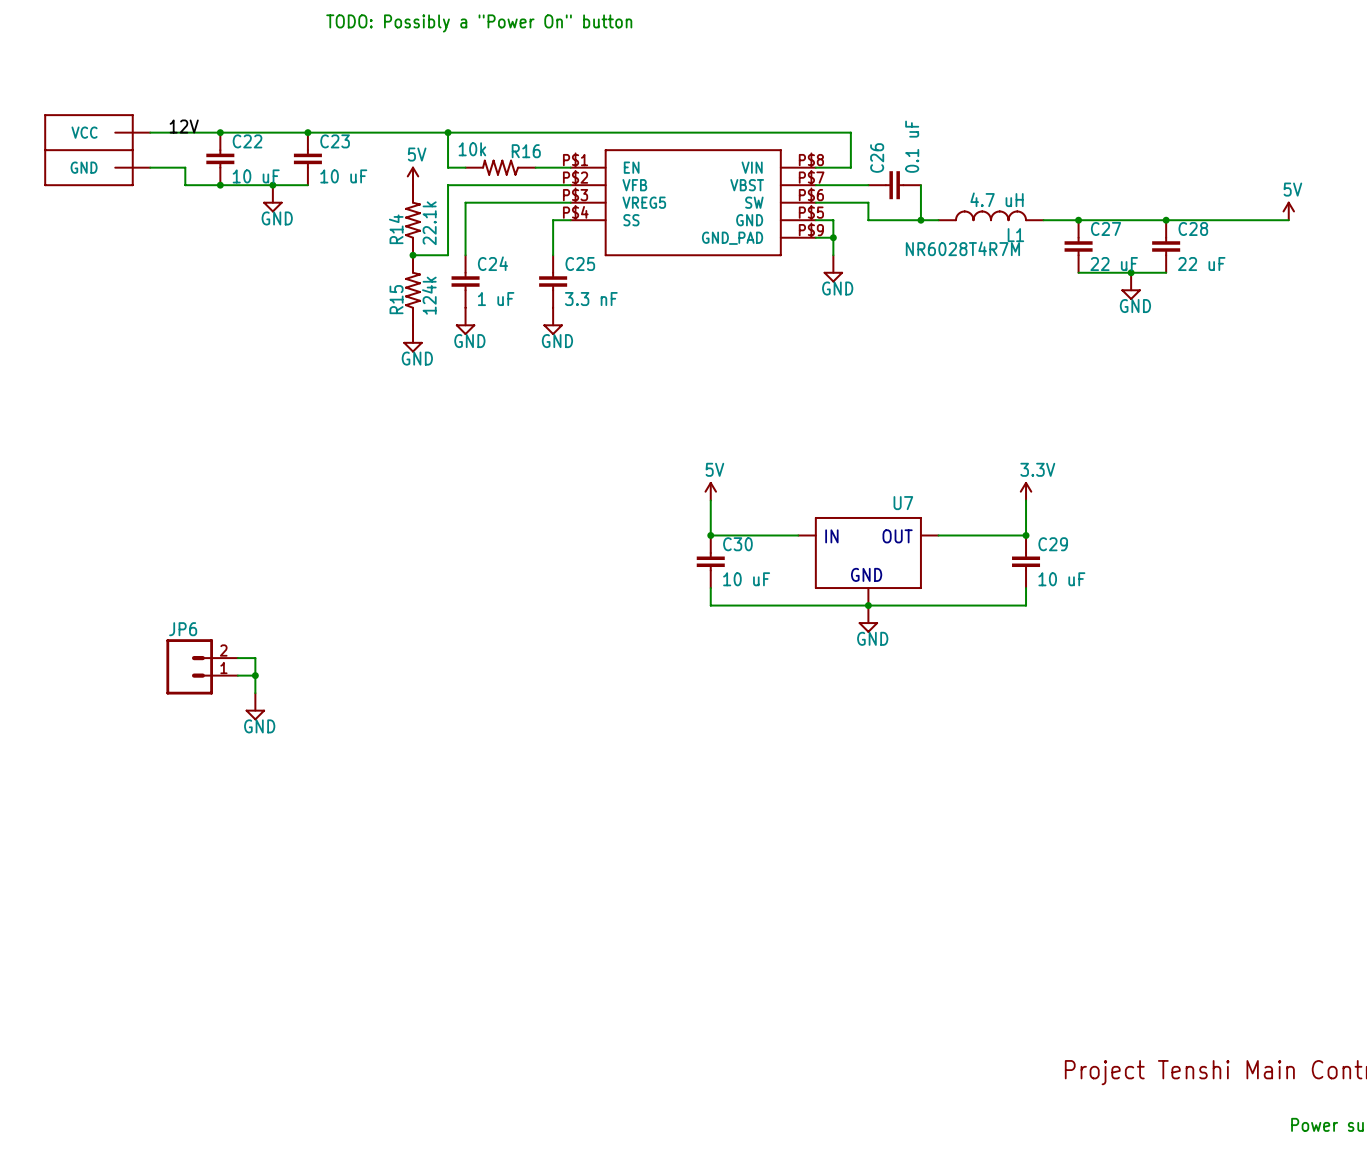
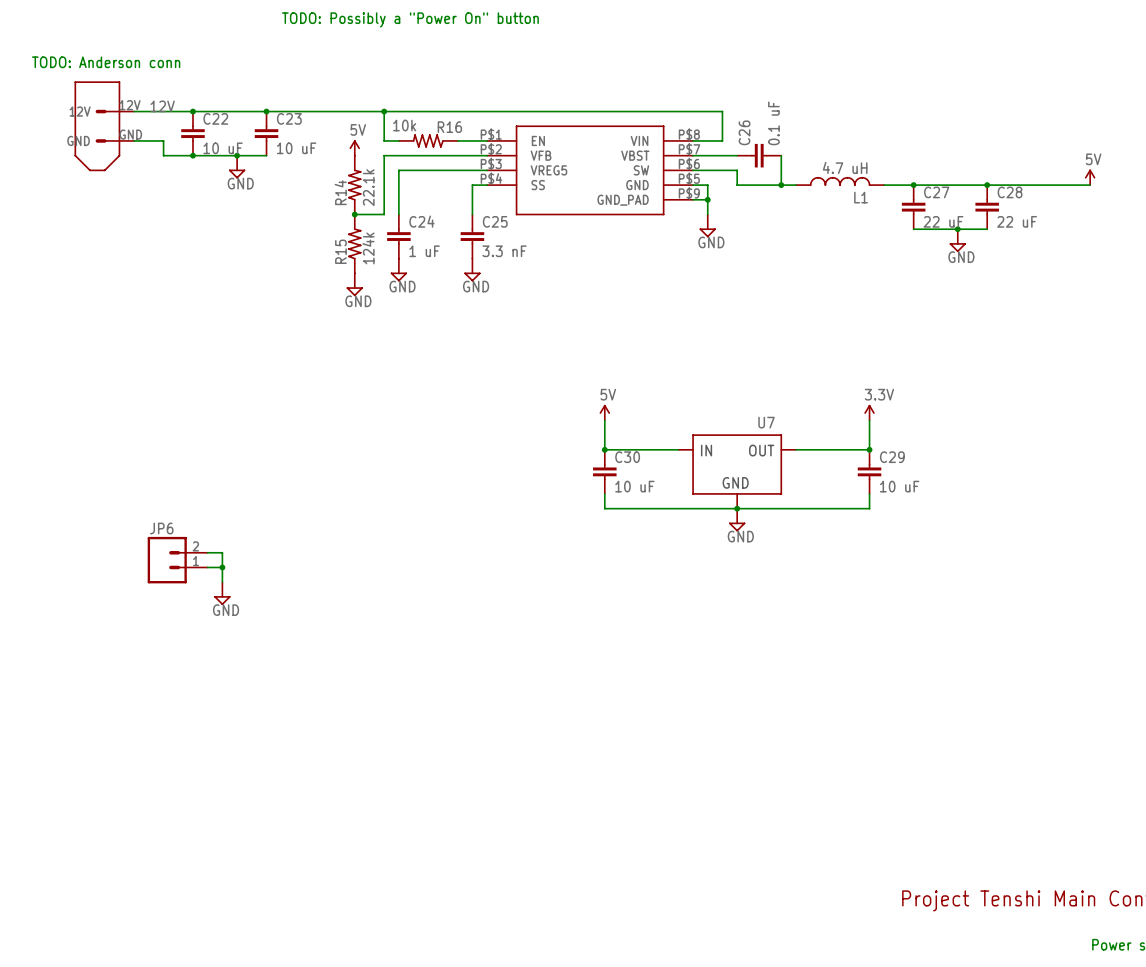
text: none -> TODO: Anderson conn (106, 62)
part: (97, 150) -> none
part: none -> (104, 126)
L1 text: NR6028T4R7M (962, 248) -> none

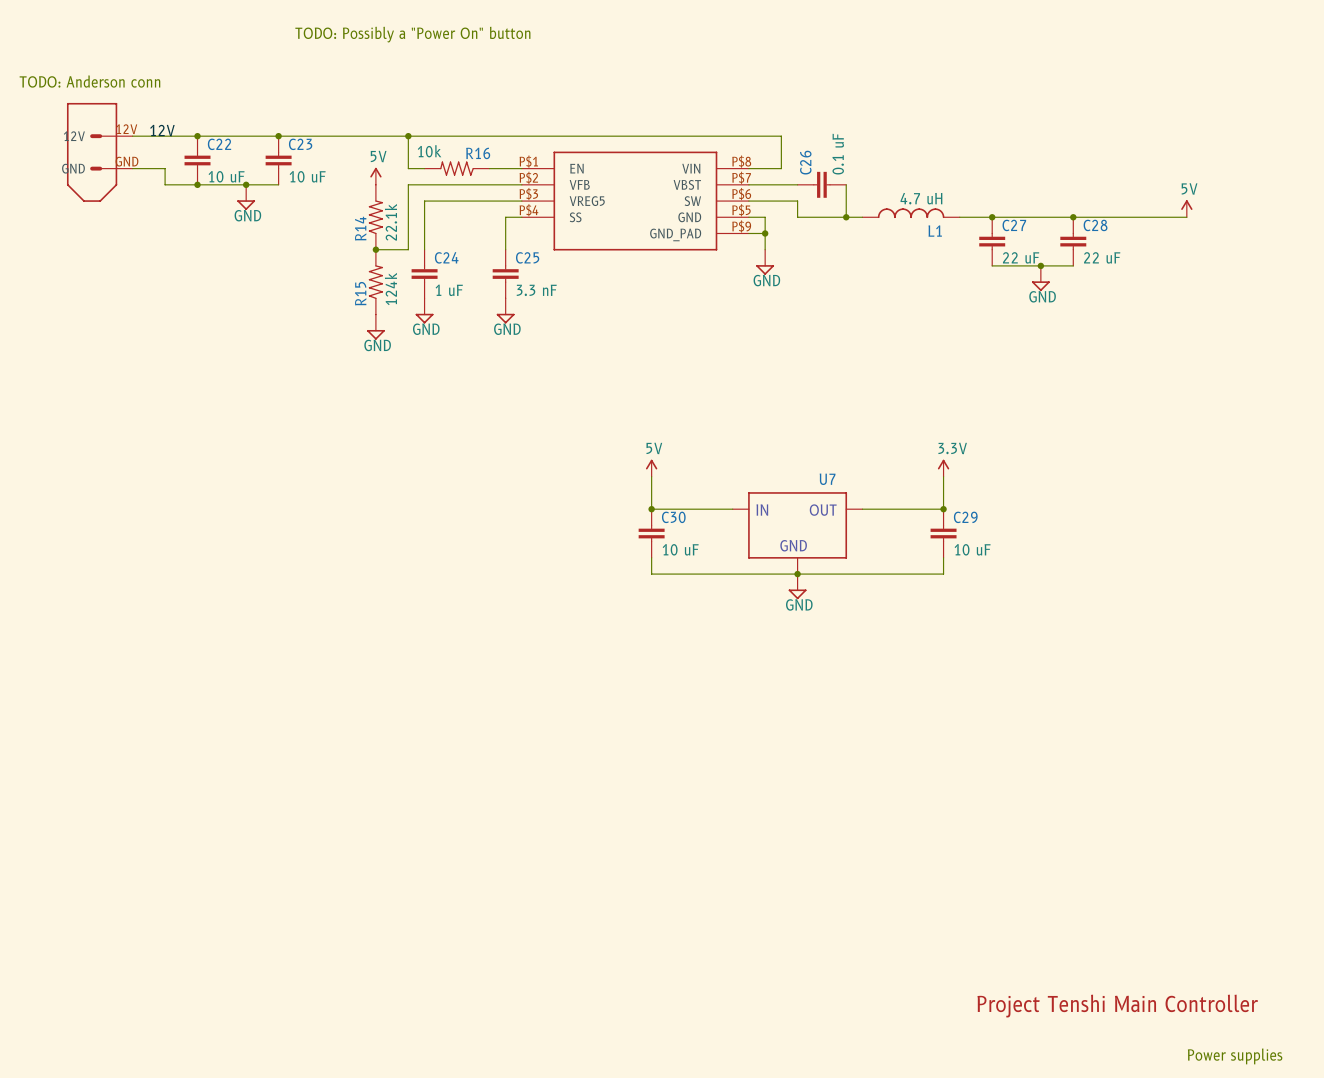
wire: (207, 552) (222, 552) (222, 582) -> none
JP6: (177, 560) -> none
wire: (207, 567) (222, 567) -> none
junction: (222, 567) -> none
power symbol: GND (222, 593) -> none

